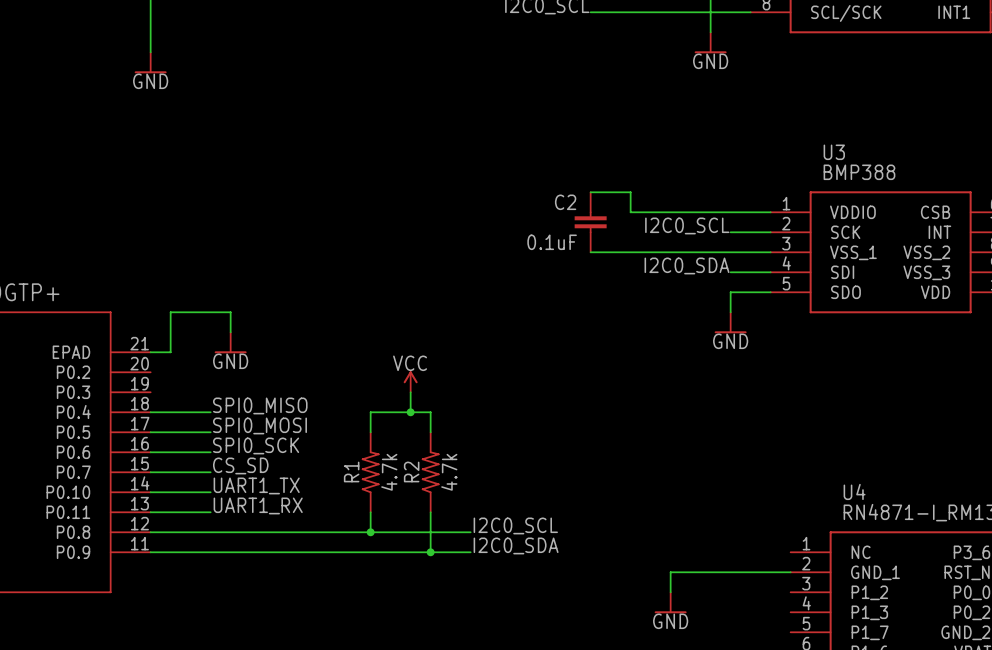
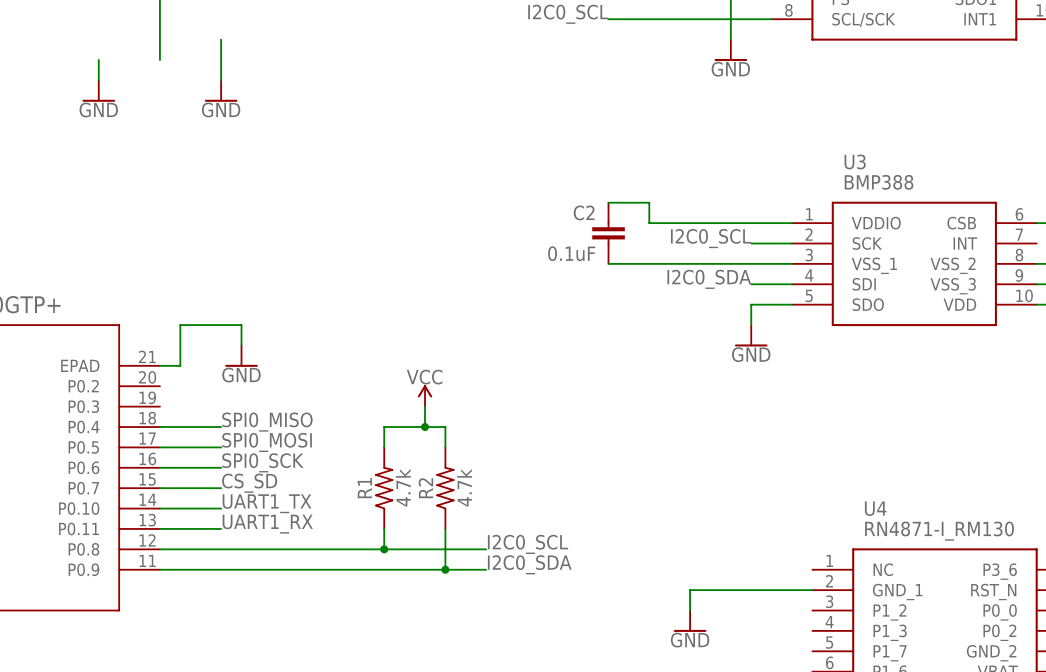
wire: none -> (221, 39) (221, 80)
wire: none -> (98, 60) (98, 80)
power symbol: GND (150, 62) -> none
power symbol: none -> GND (98, 91)
power symbol: none -> GND (221, 91)

